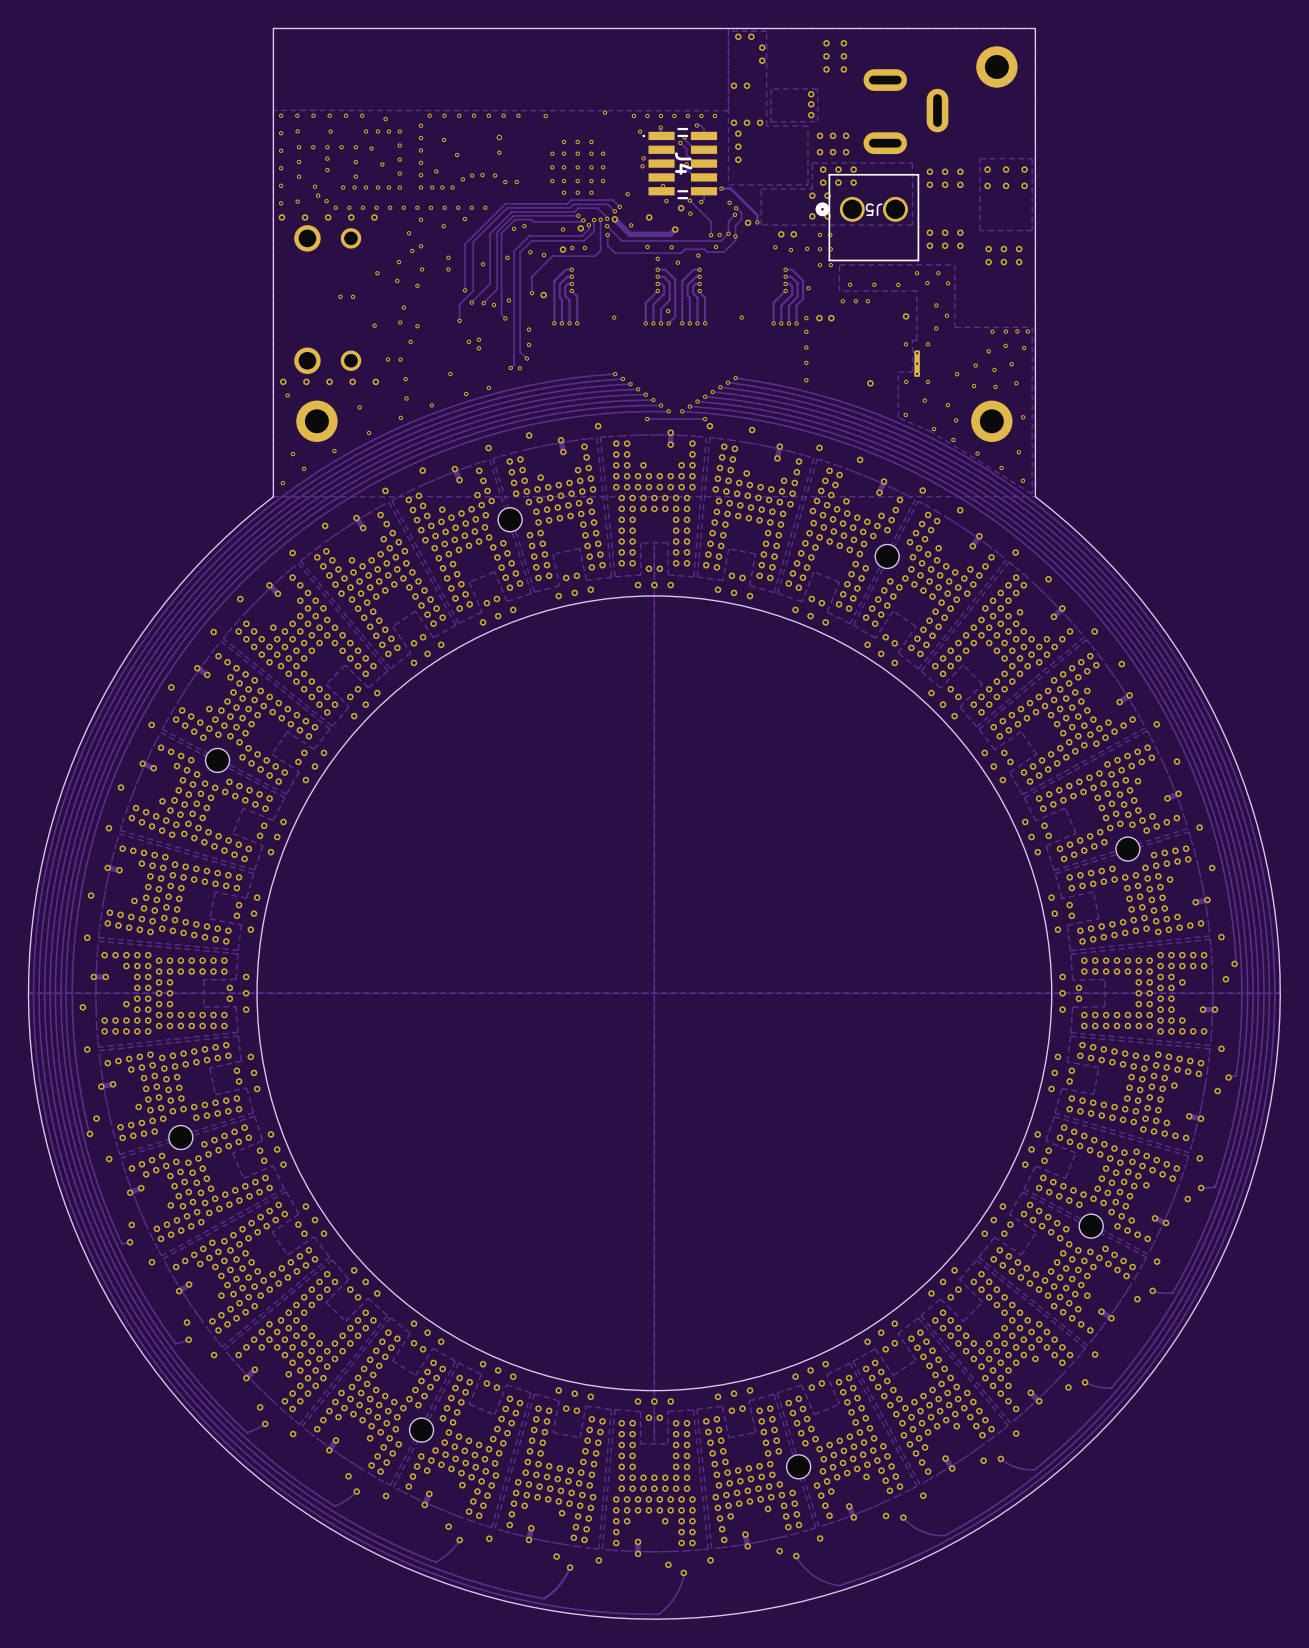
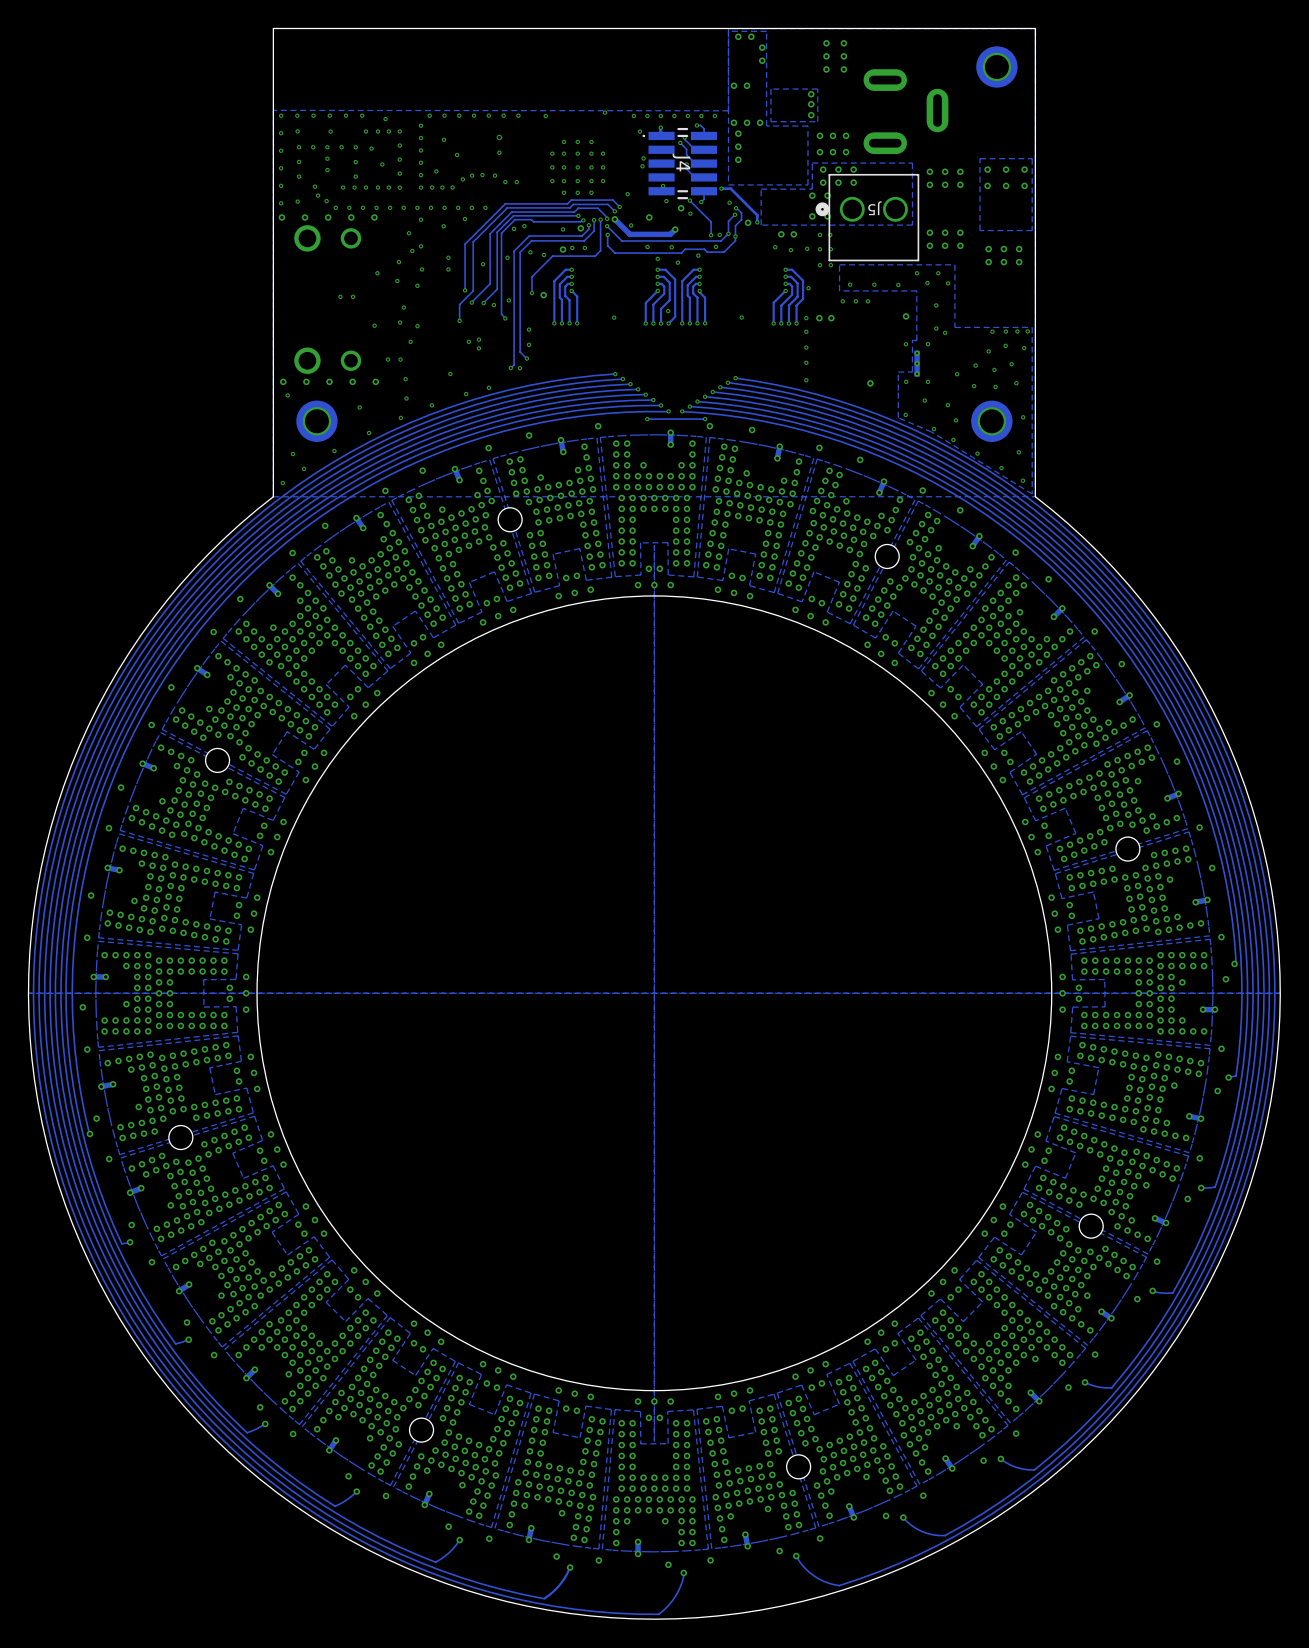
via position: (946, 315) -> (945, 332)

